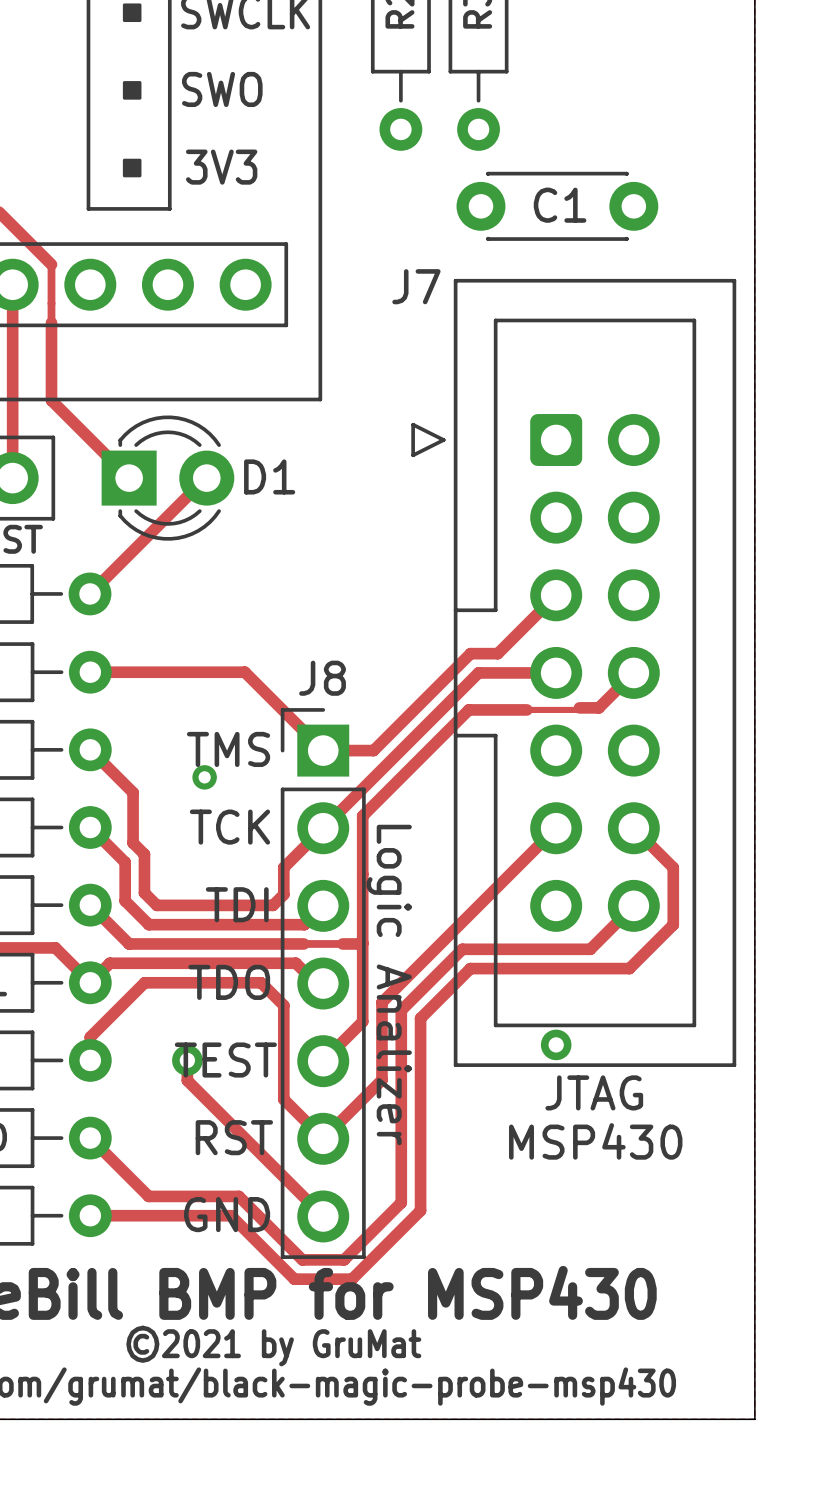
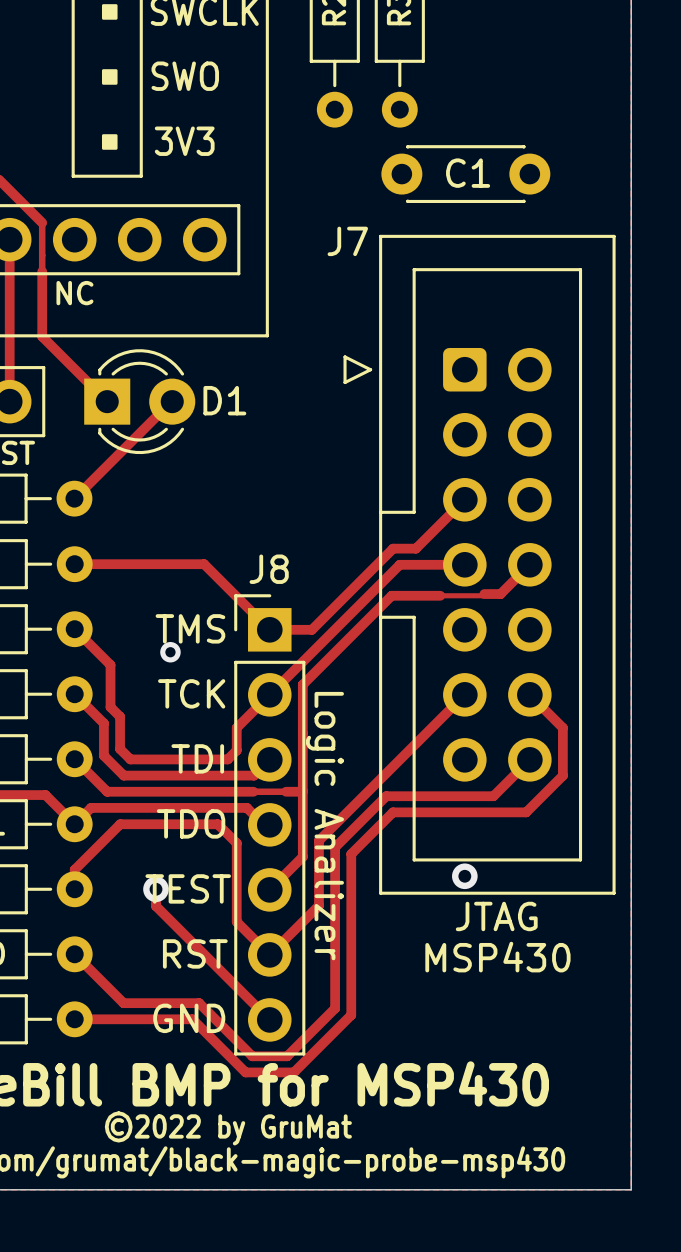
text: none -> NC (74, 293)
text: ©2021 by GruMat (273, 1346) -> ©2022 by GruMat (228, 1128)

